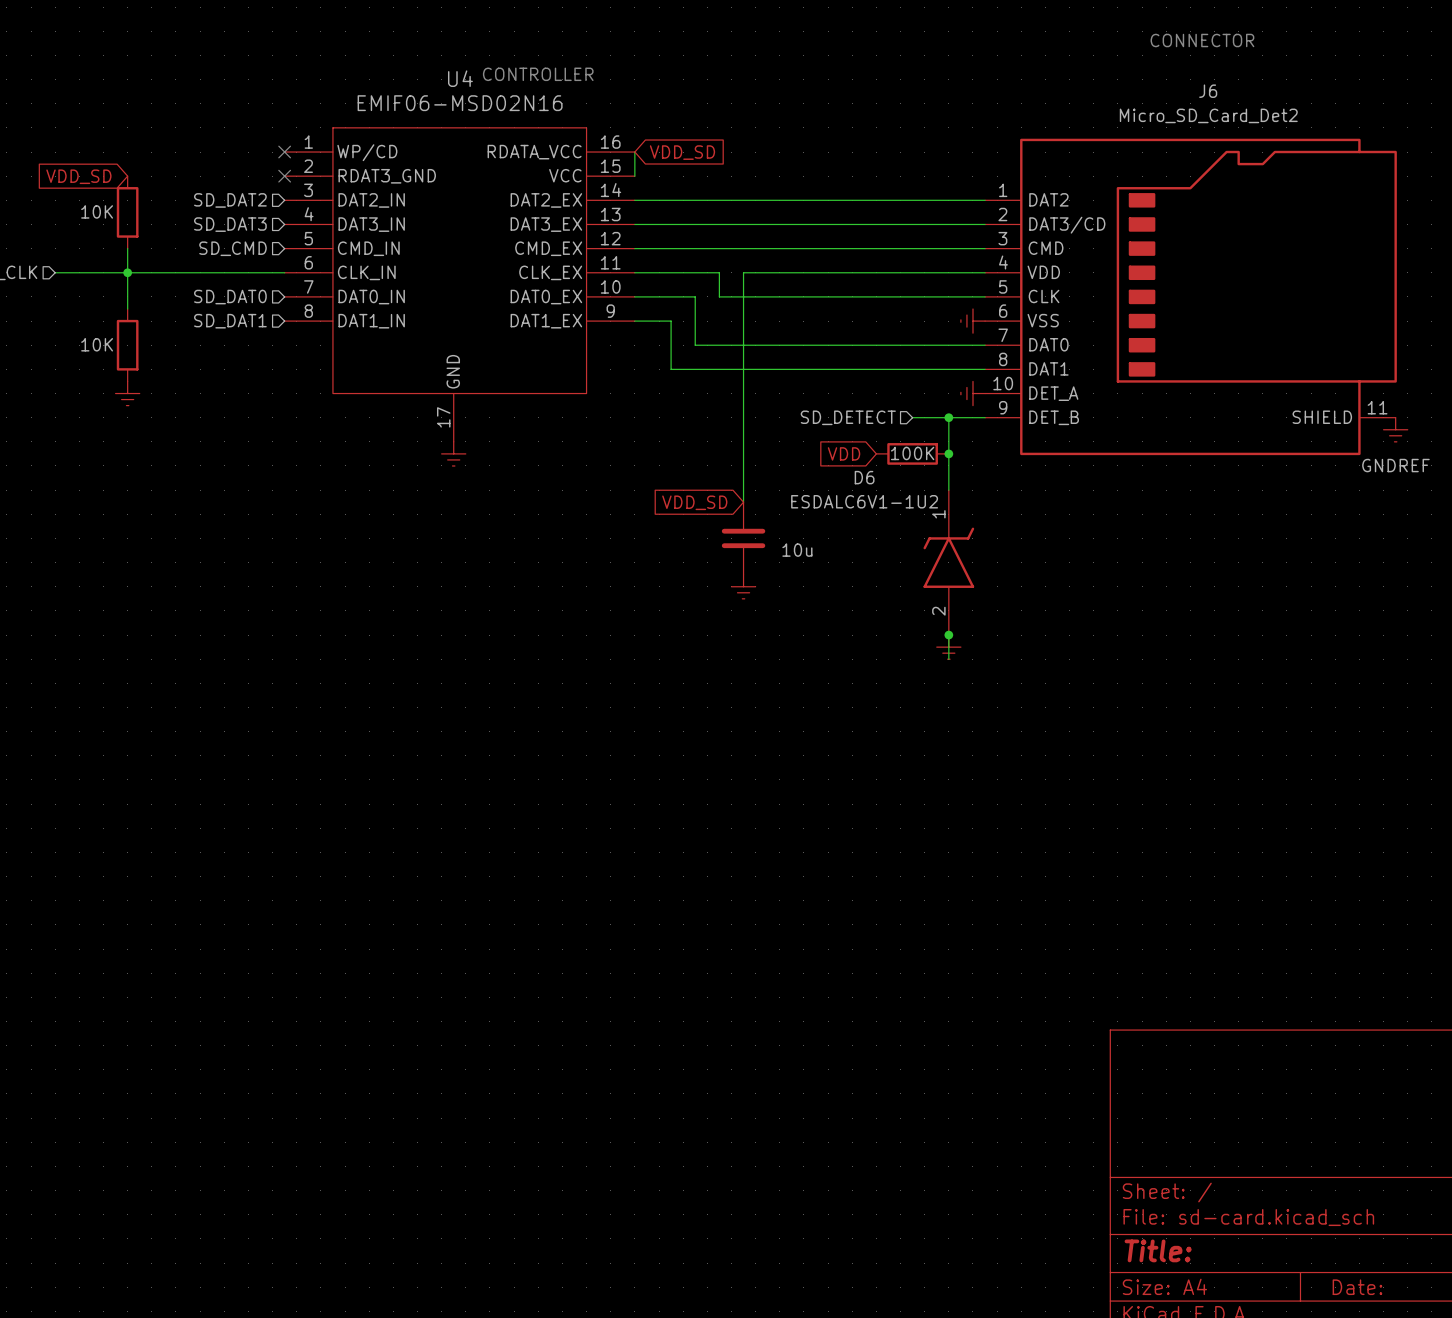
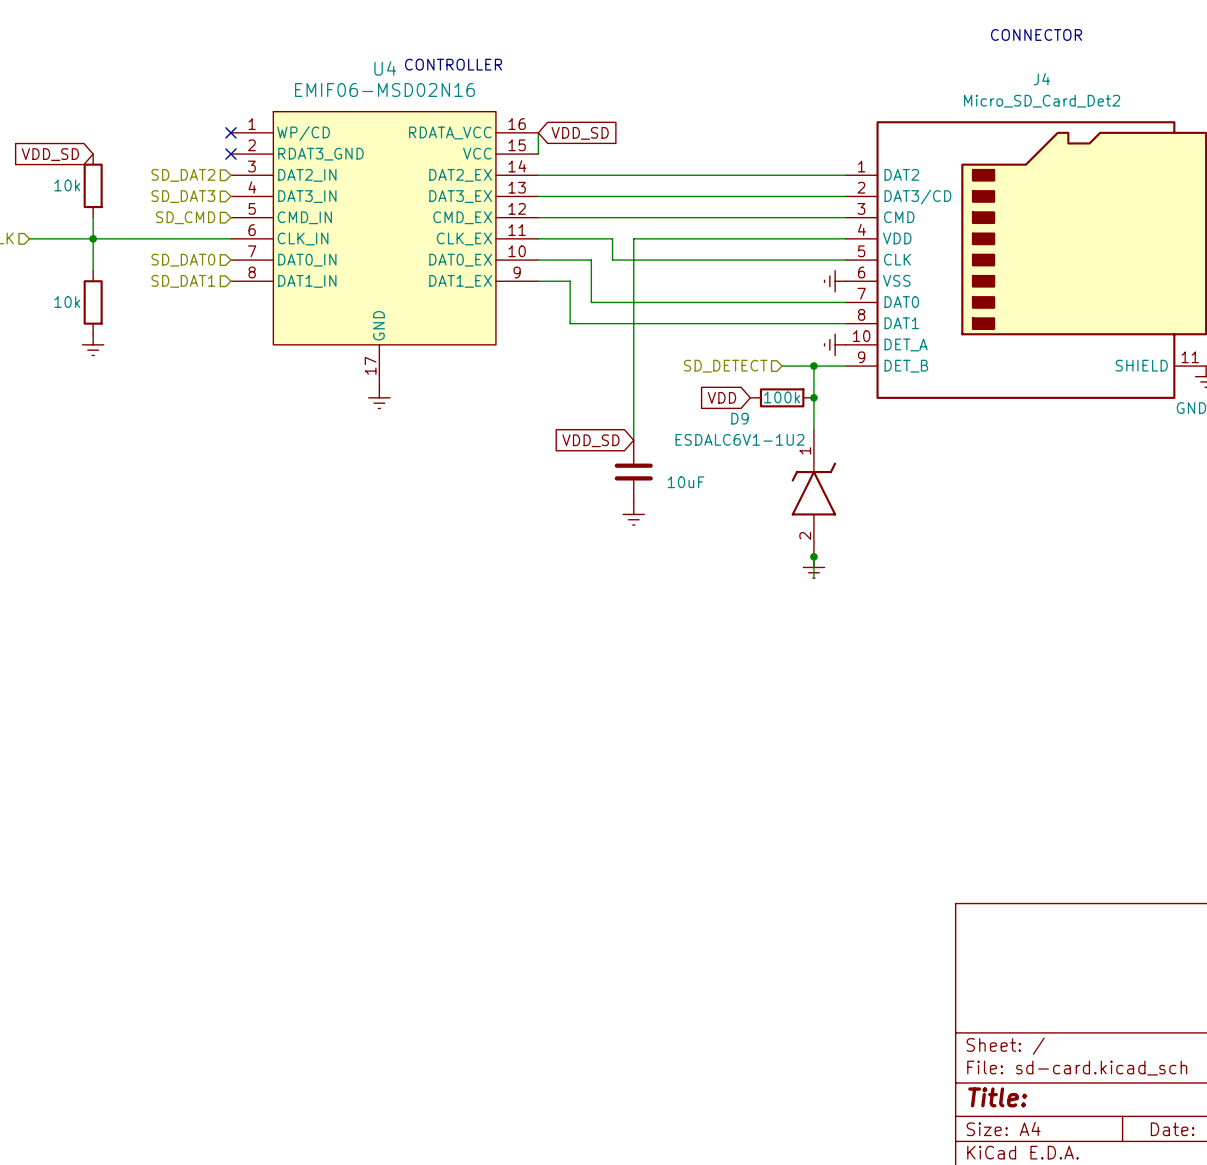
J6 name: J6 (1208, 91) -> J4 (1041, 79)
part value: 10K (97, 211) -> 10k (67, 185)
part value: 10K (97, 344) -> 10k (67, 302)
part value: 100K (912, 453) -> 100k (782, 397)
D6 name: D6 (864, 477) -> D9 (739, 418)
part value: 10u (797, 550) -> 10uF (686, 482)

